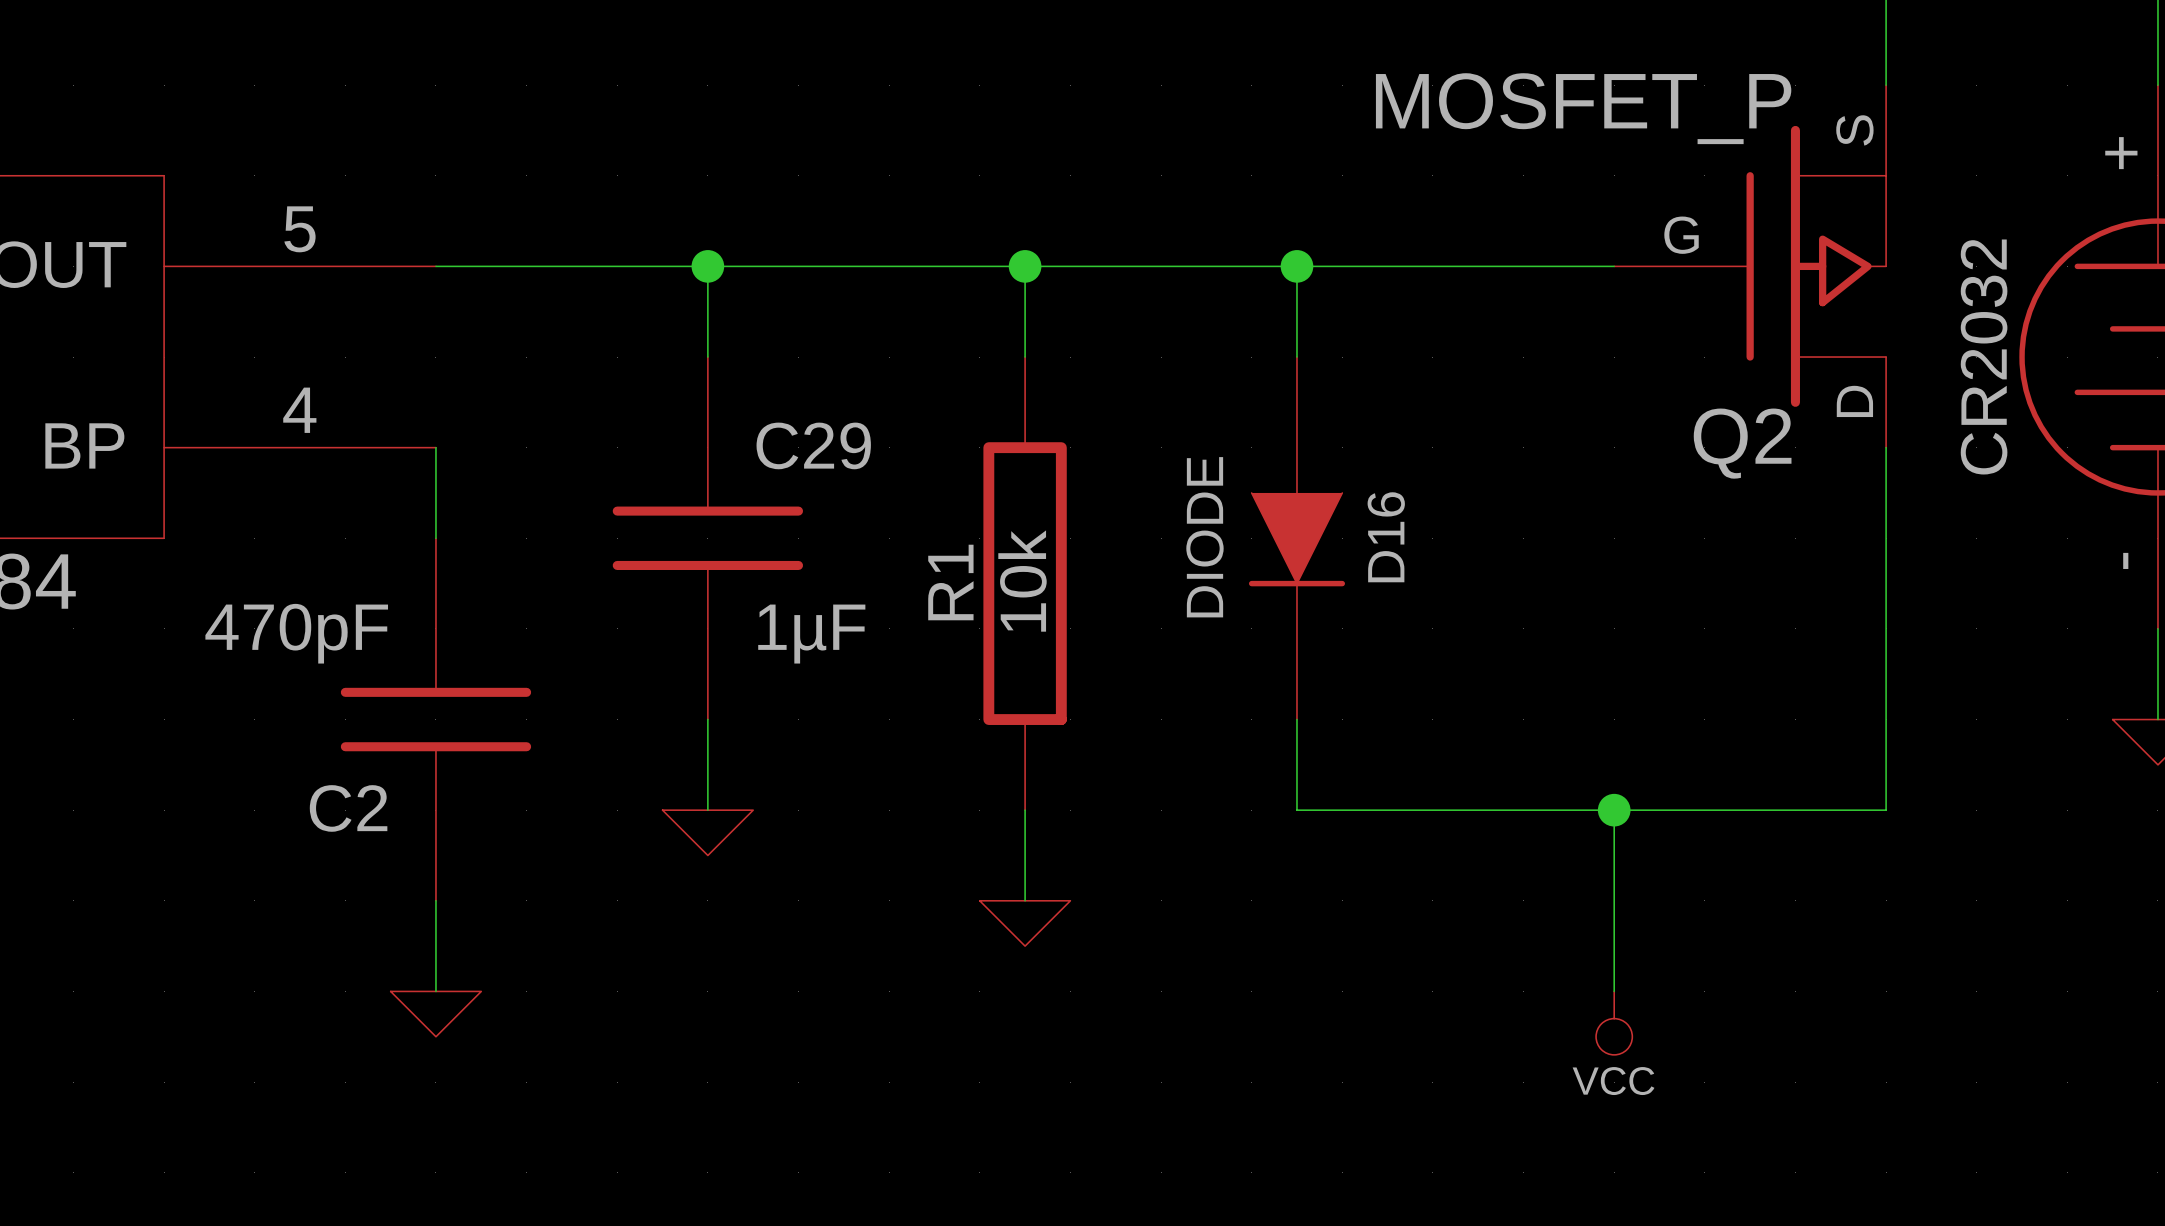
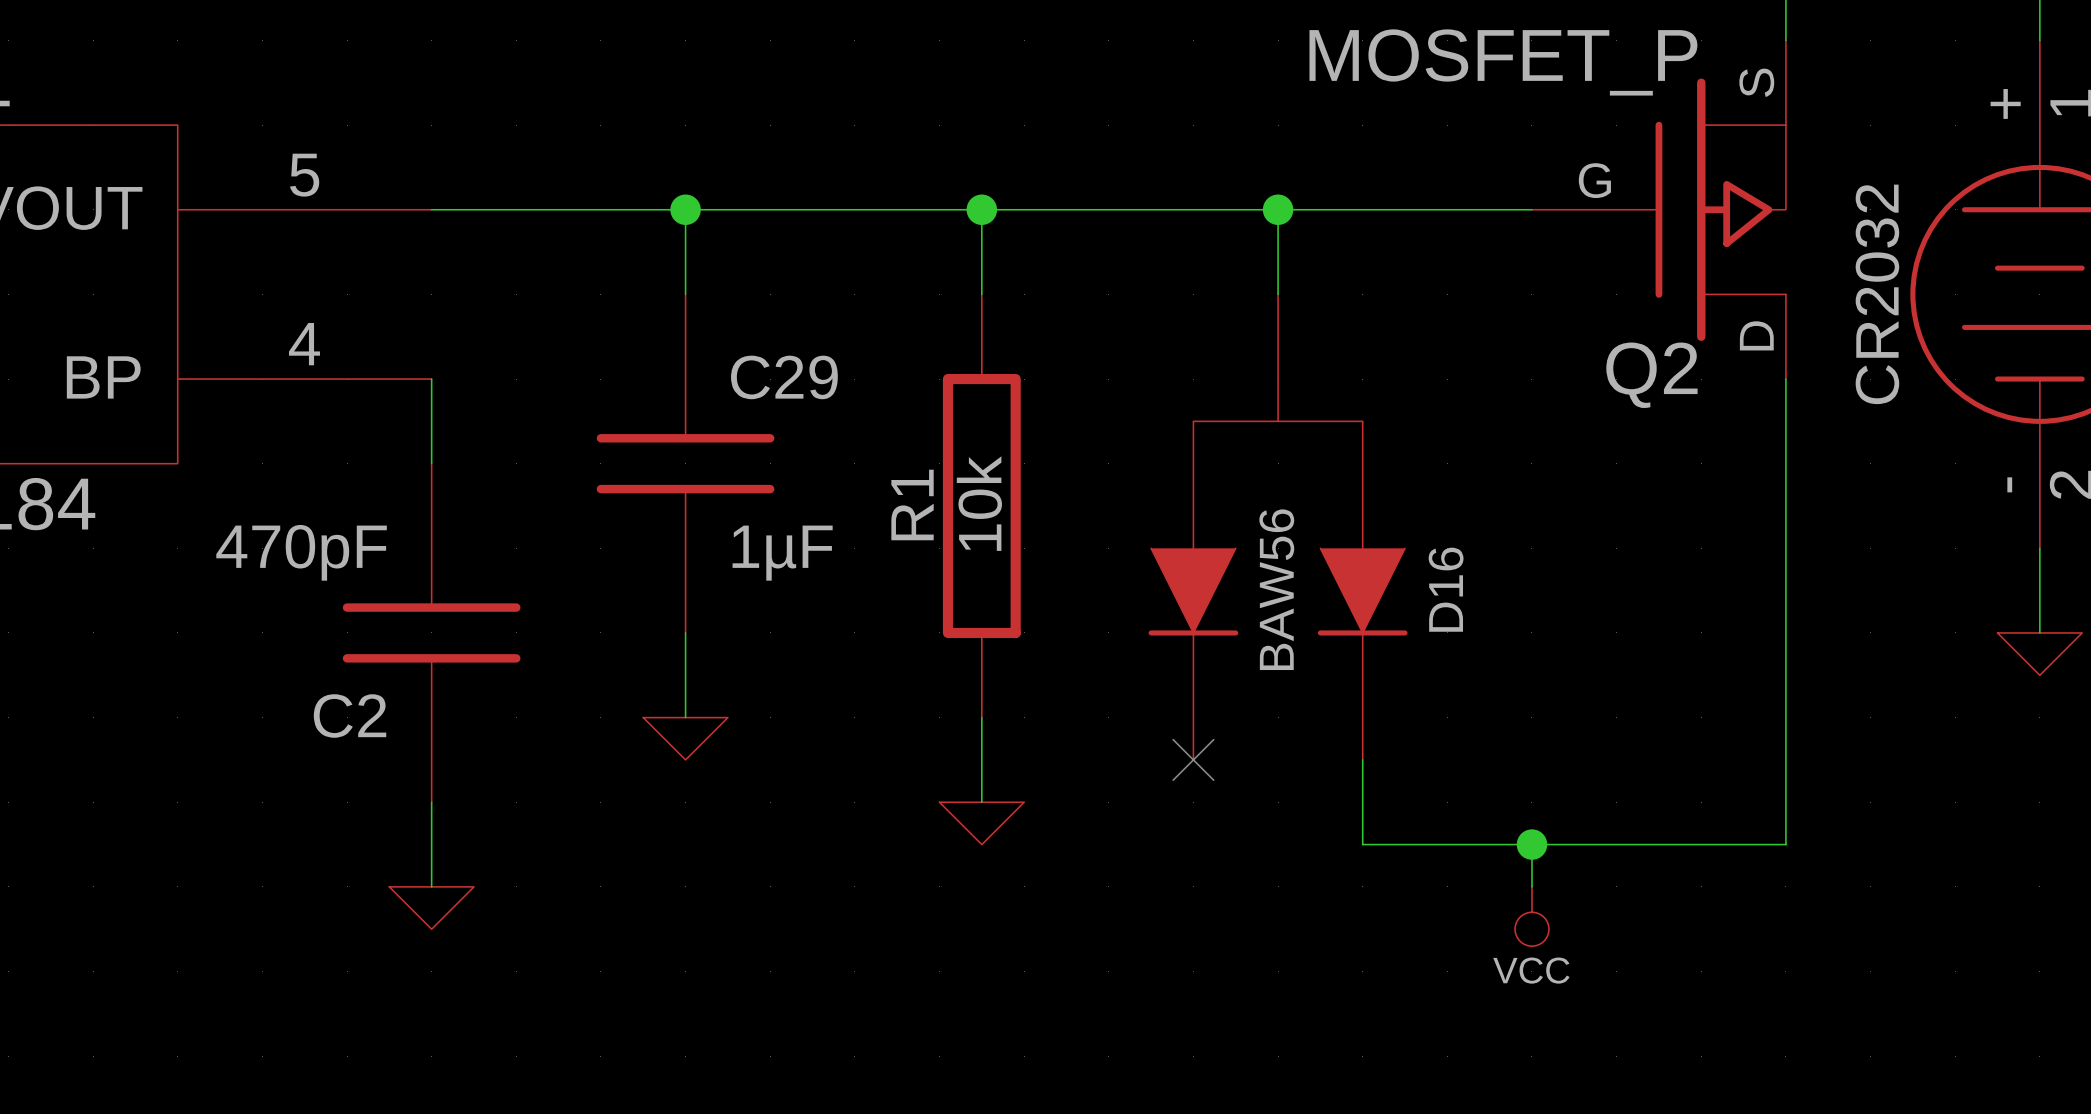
wire: (1296, 266) (1296, 357) -> (1278, 209) (1278, 294)
junction position: (1296, 266) -> (1278, 209)
D16 symbol: [1248, 357, 1346, 720] -> [1148, 294, 1408, 760]
D16 value: DIODE (1204, 537) -> BAW56 (1276, 589)
D16 name position: D16 (1386, 537) -> D16 (1446, 589)
wire: (1296, 719) (1296, 810) (1886, 810) -> (1362, 759) (1362, 844) (1785, 844) (1785, 717)
wire: (1614, 810) (1614, 946) -> none
junction position: (1614, 810) -> (1531, 844)
no-connect mark: none -> (1193, 759)

